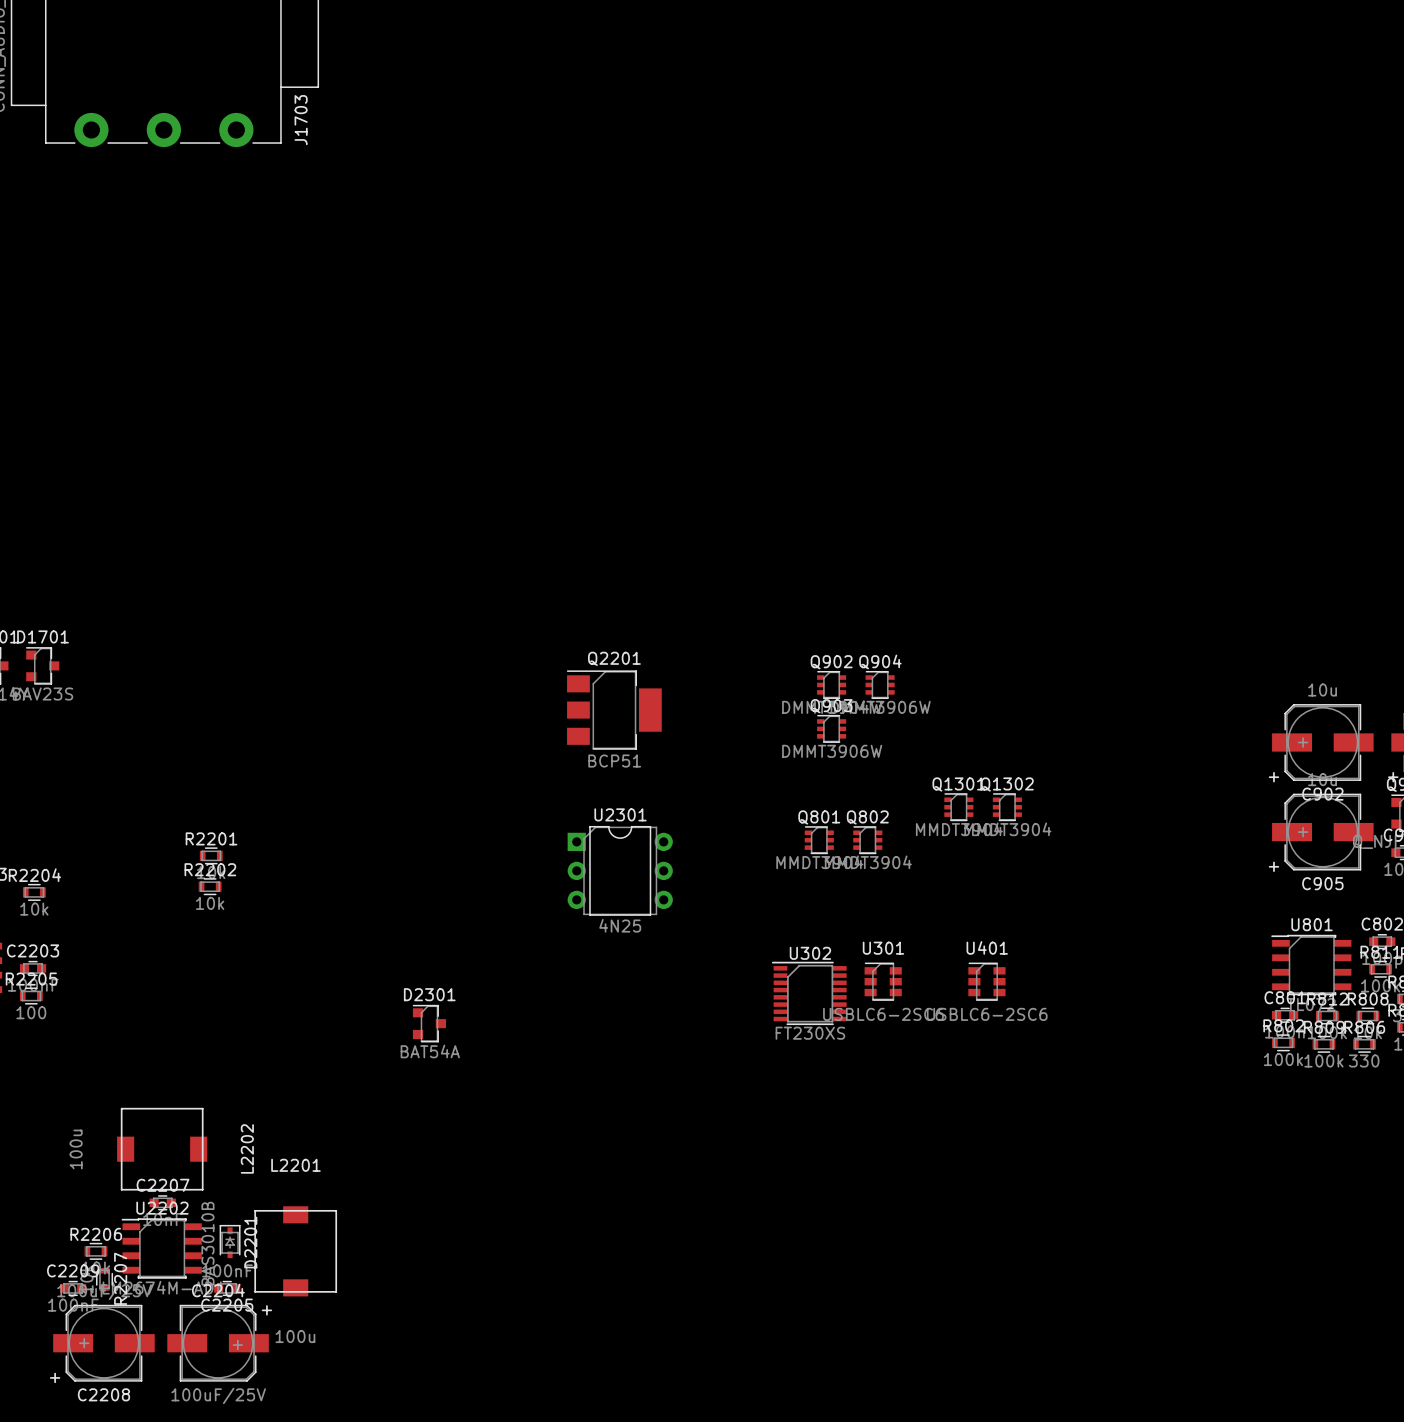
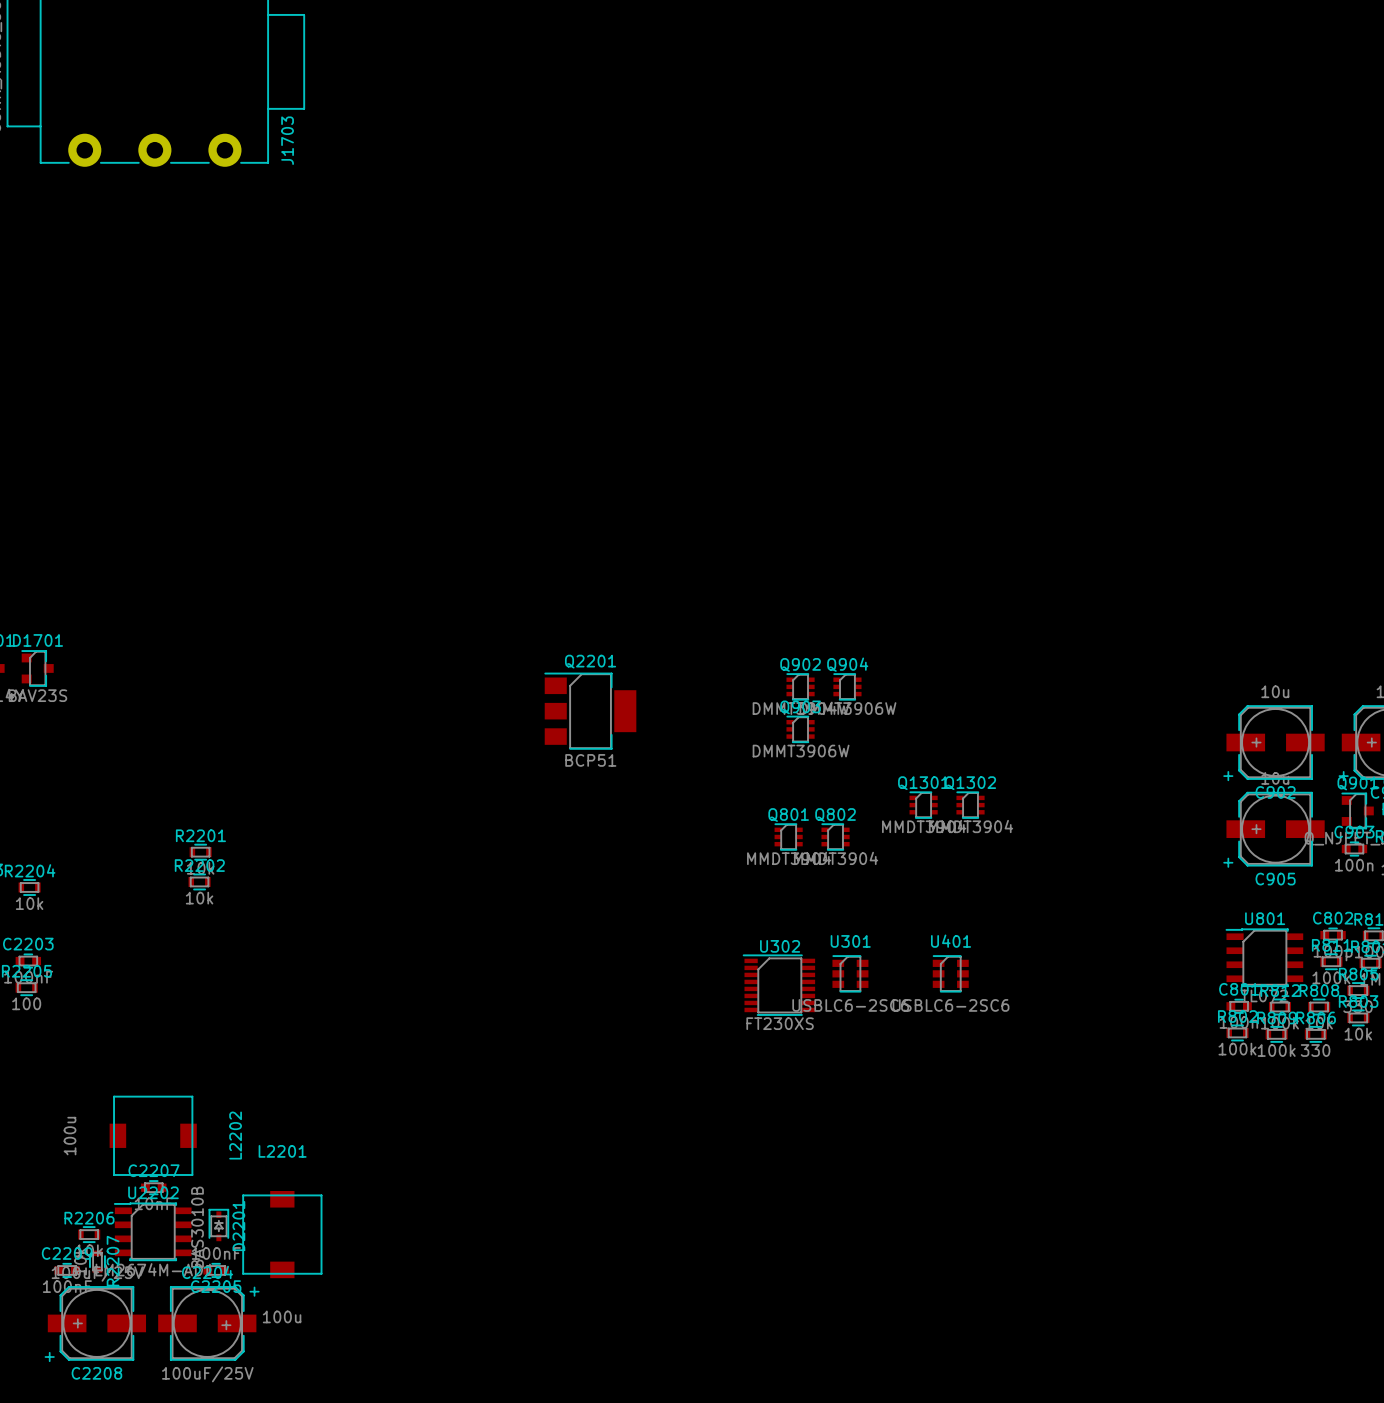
U2301: 4N25 (620, 870) -> none
D2301: BAT54A (429, 1023) -> none

